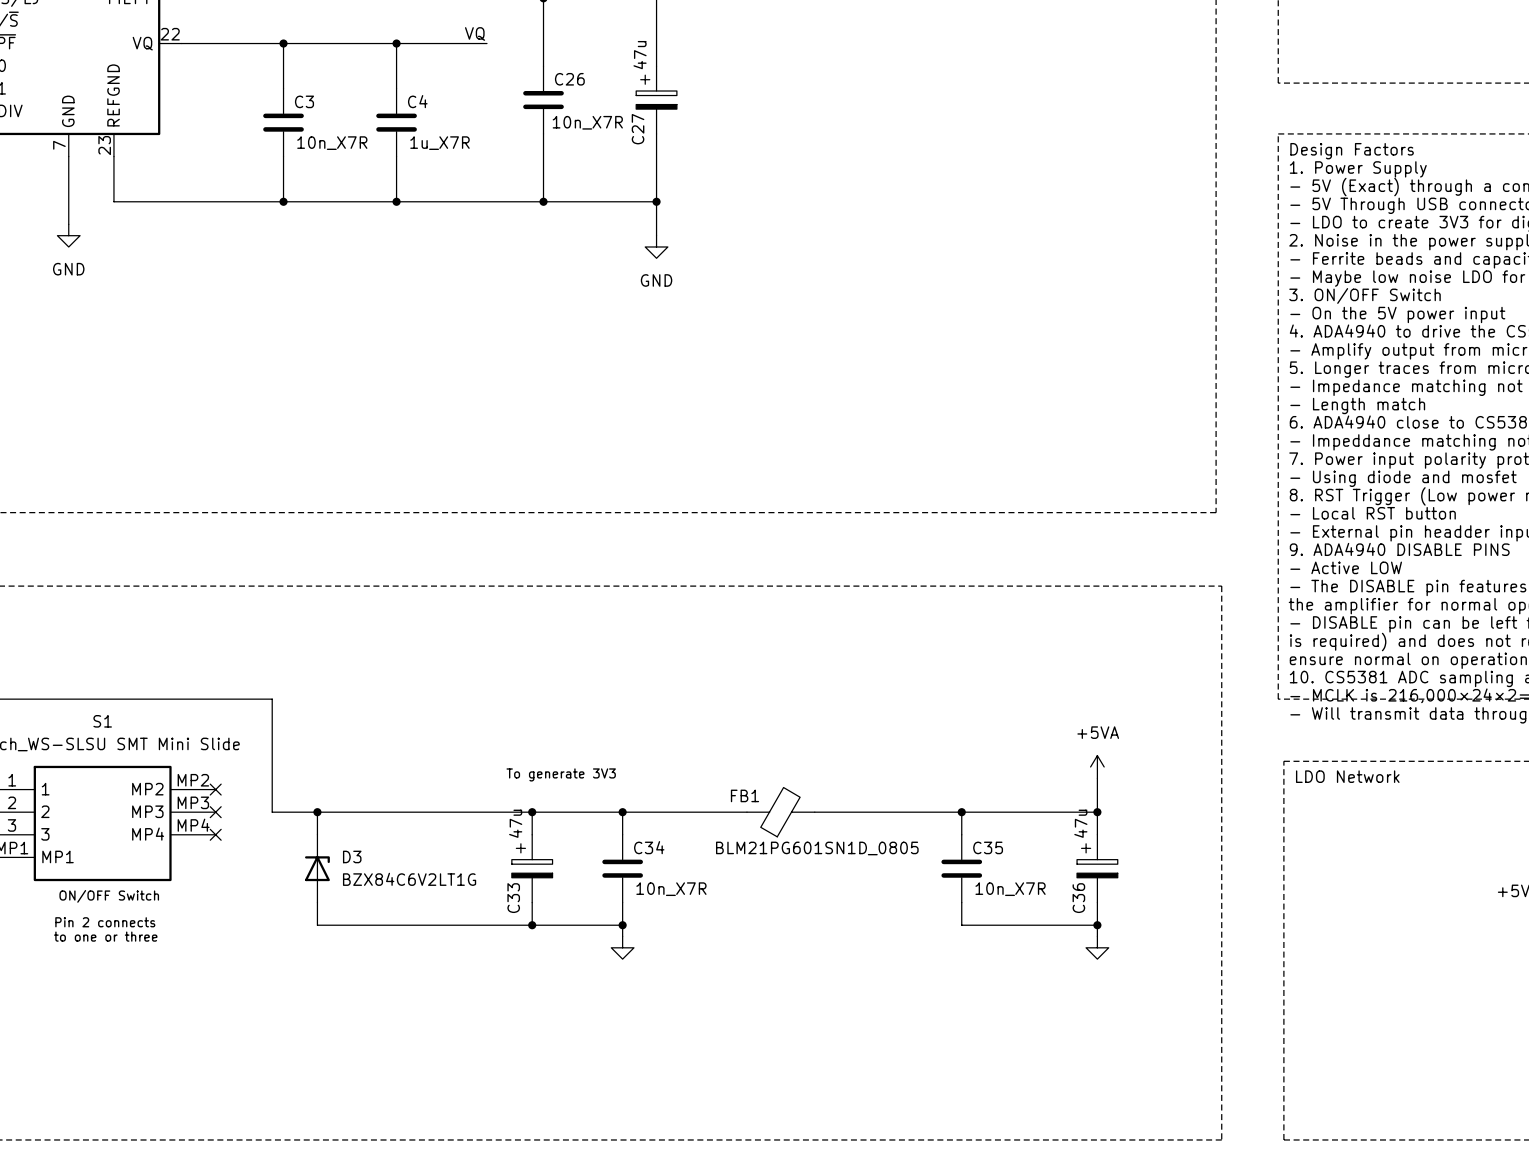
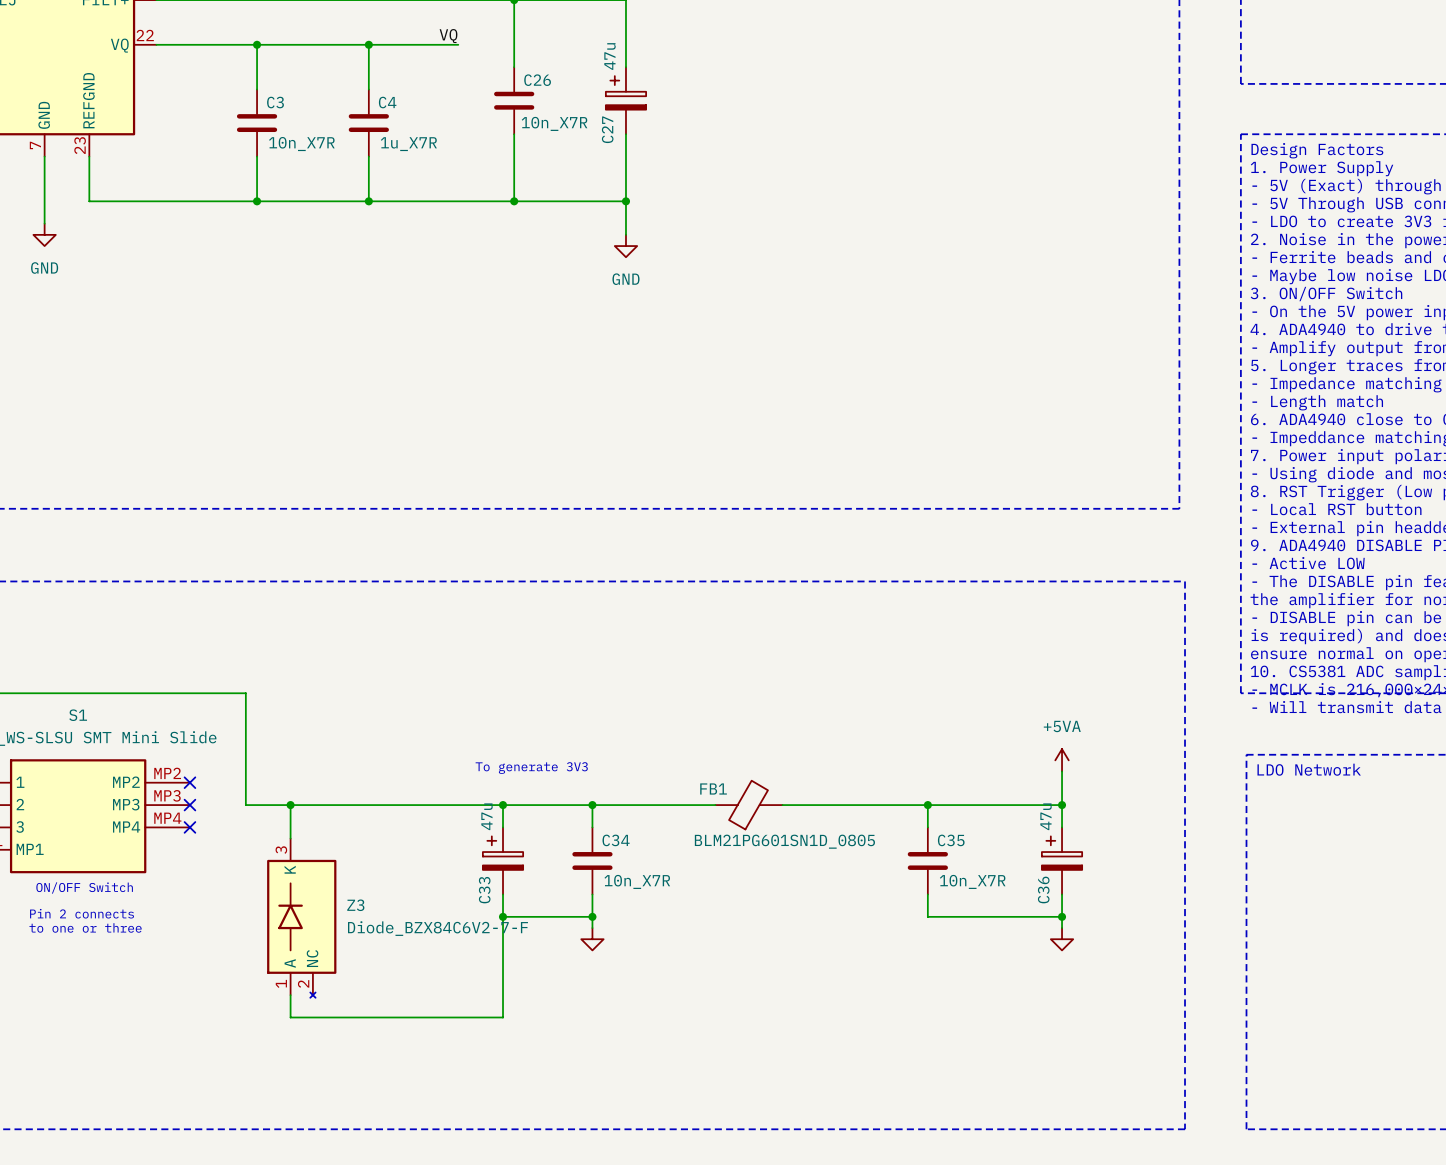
D3: BZX84C6V2LT1G (317, 868) -> none
wire: (317, 902) (317, 925) (532, 925) -> (290, 995) (290, 1017) (503, 1017) (503, 916)
Z3: none -> Diode_BZX84C6V2-7-F (301, 918)

